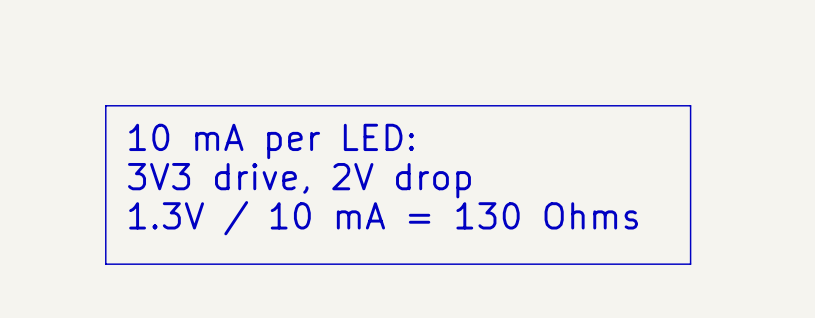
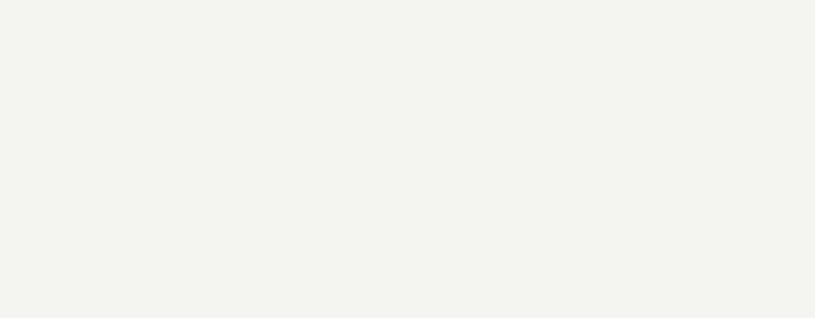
line: (105, 105) (690, 105) (690, 264) (105, 264) (105, 105) -> none
text: 10 mA per LED: (271, 141) -> none
text: 3V3 drive, 2V drop (299, 180) -> none
text: 1.3V / 10 mA = 130 Ohms (383, 218) -> none

